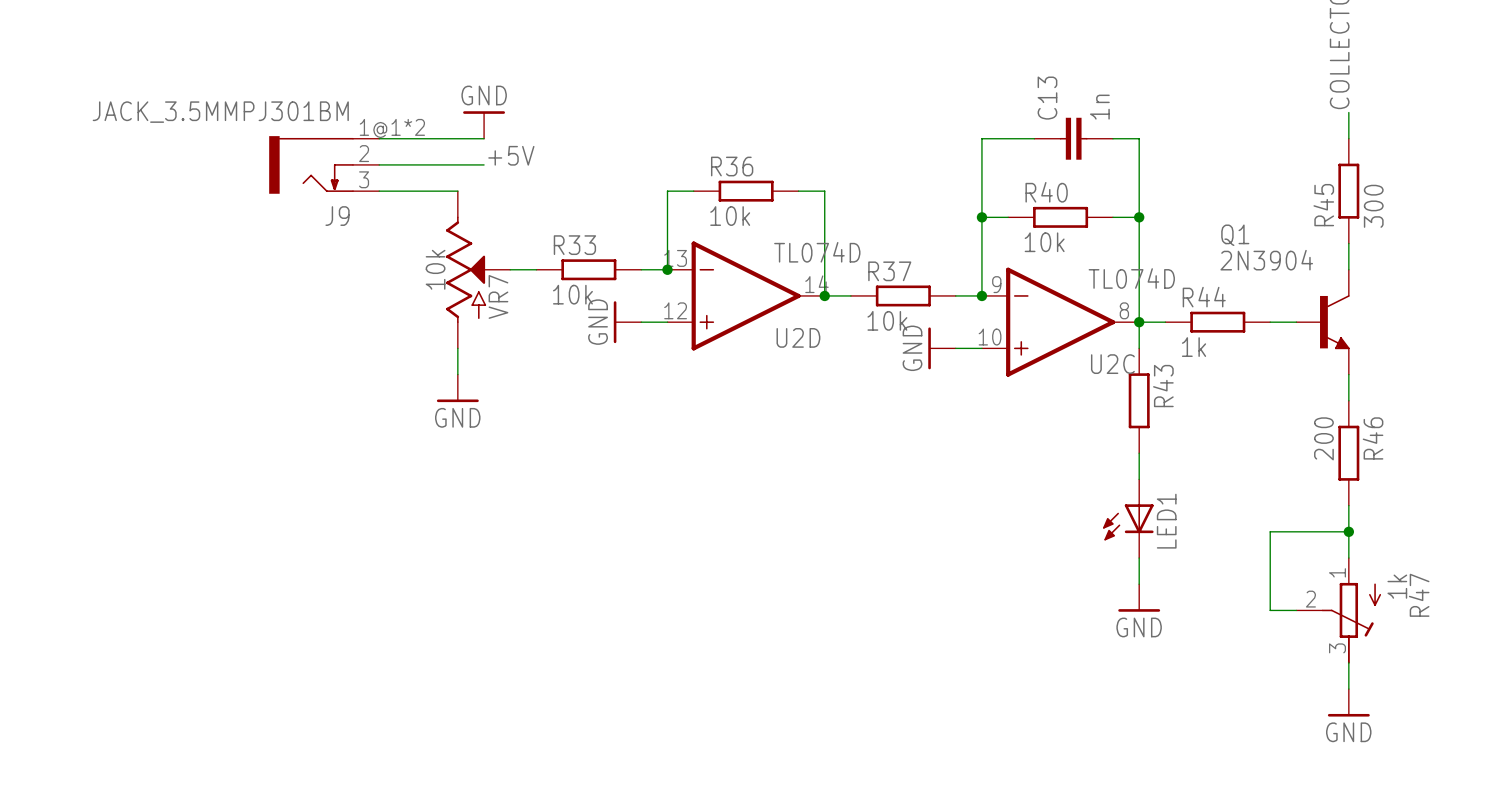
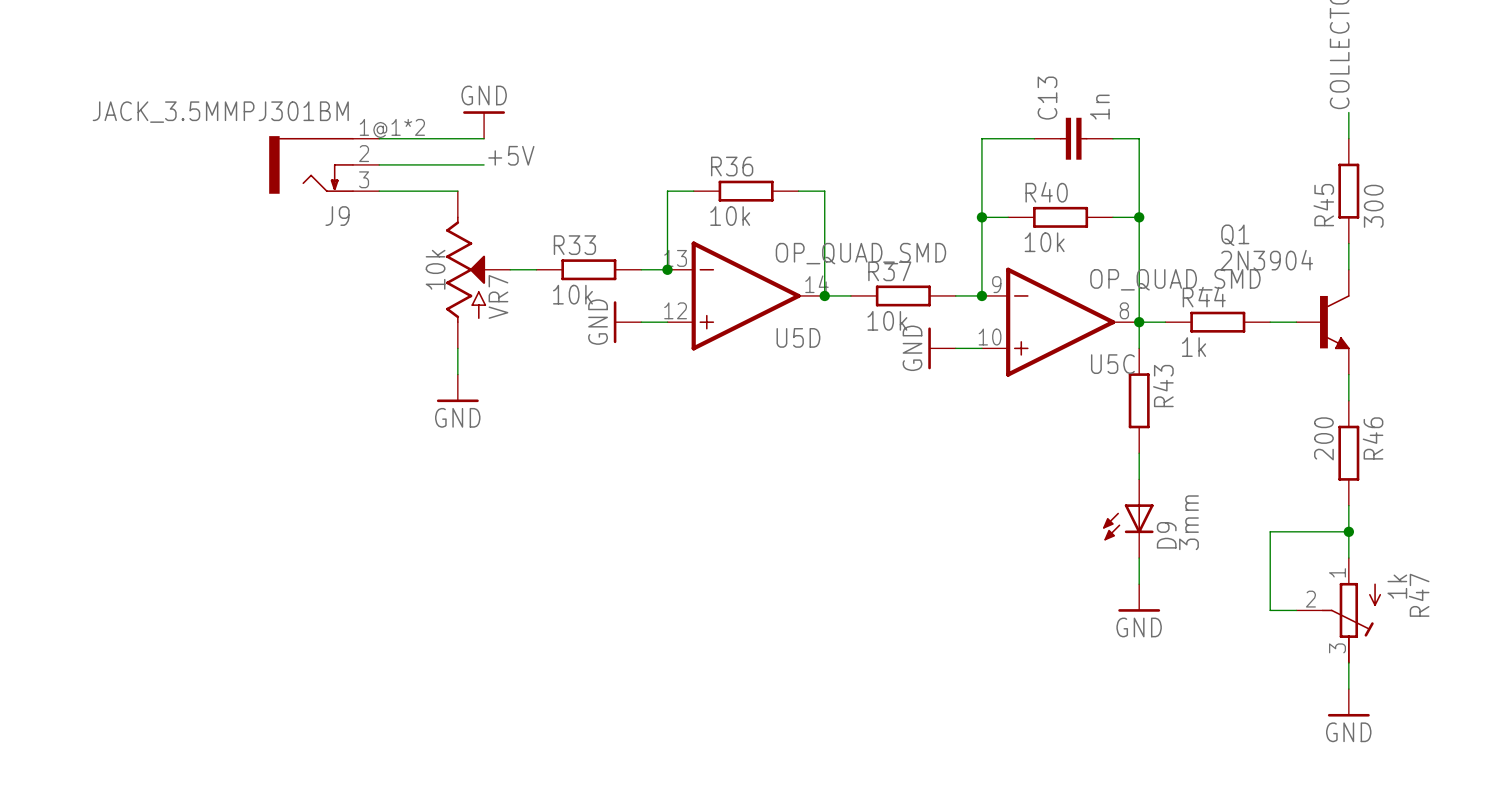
U2D value: TL074D (817, 252) -> OP_QUAD_SMD (860, 253)
U2C value: TL074D (1131, 278) -> OP_QUAD_SMD (1175, 279)
U2D name: U2D (798, 337) -> U5D (798, 337)
U2C name: U2C (1112, 364) -> U5C (1112, 364)
LED1 name: LED1 (1166, 521) -> D9 (1166, 535)
LED1 value: none -> 3mm (1188, 522)

